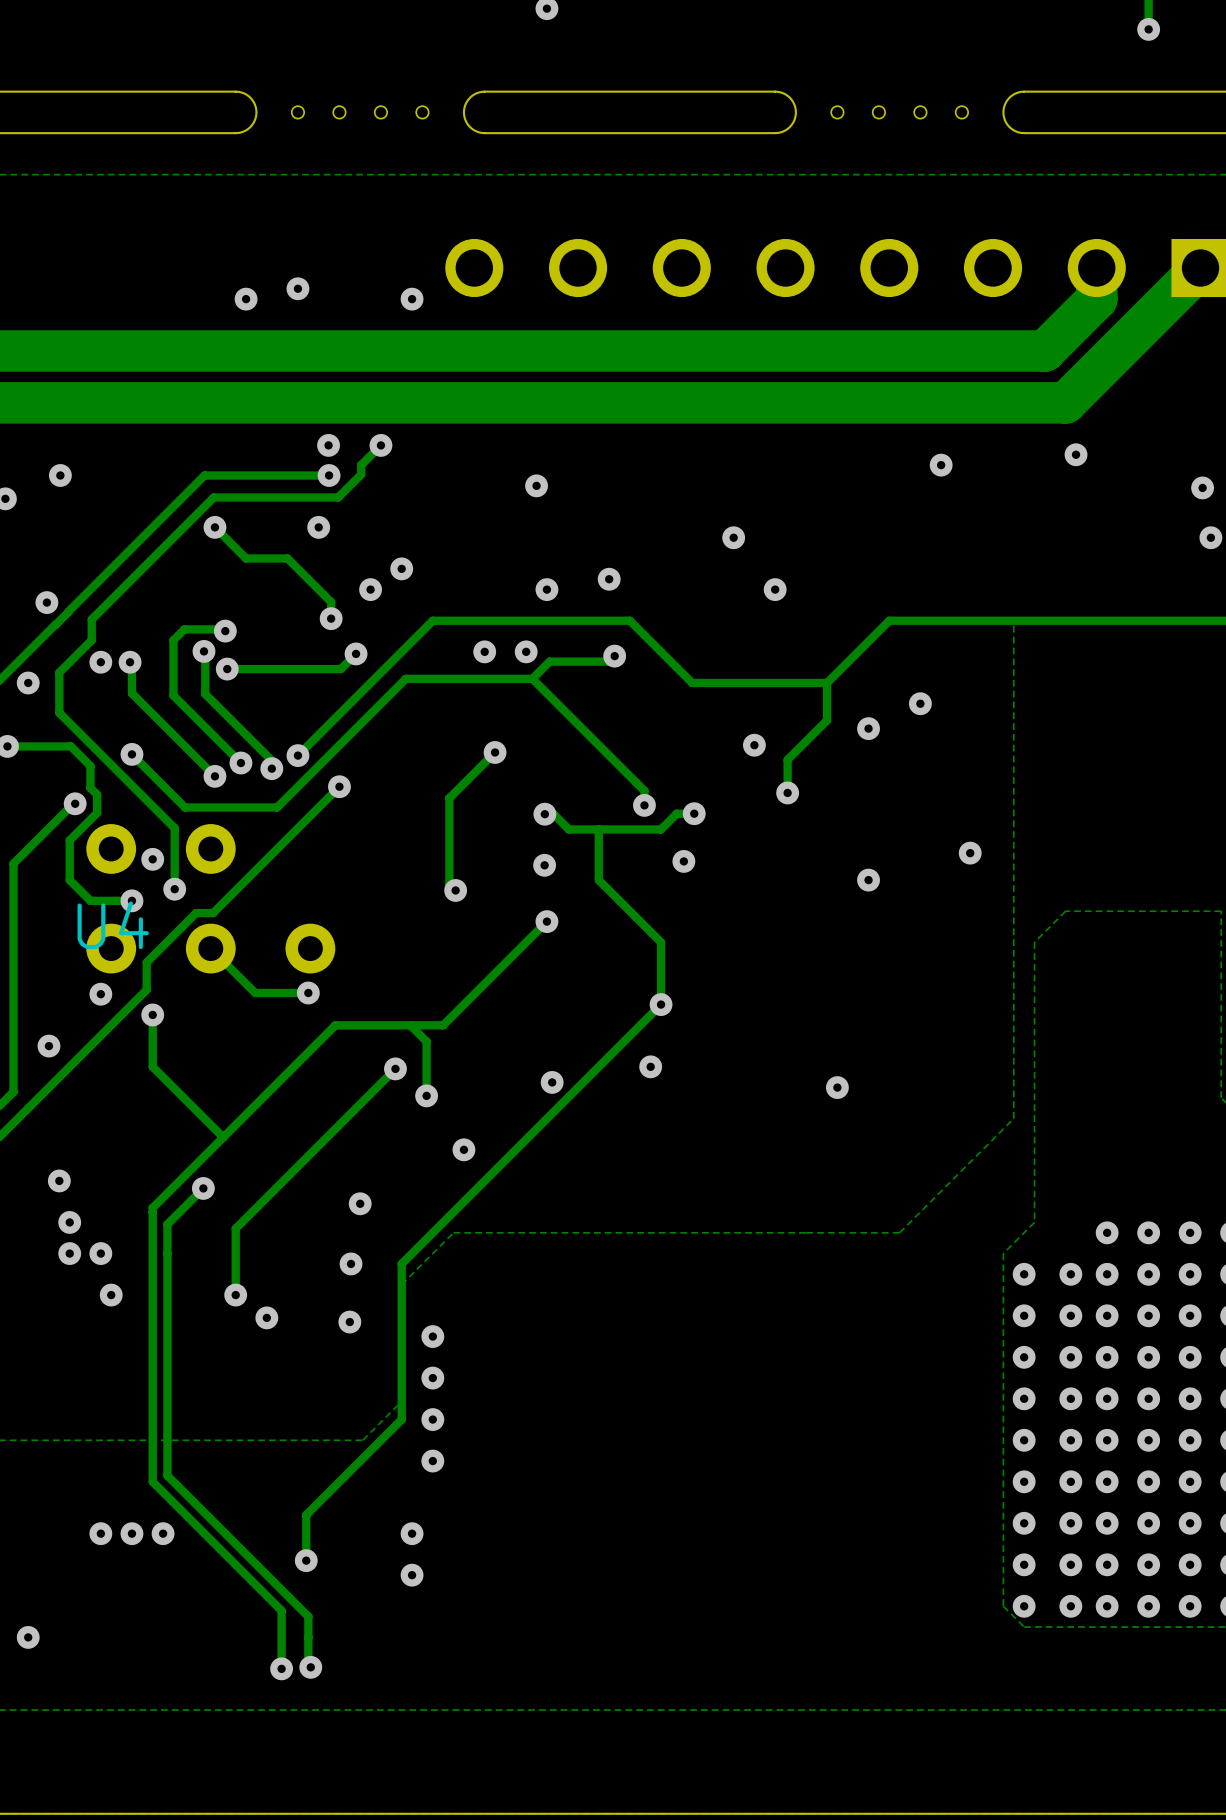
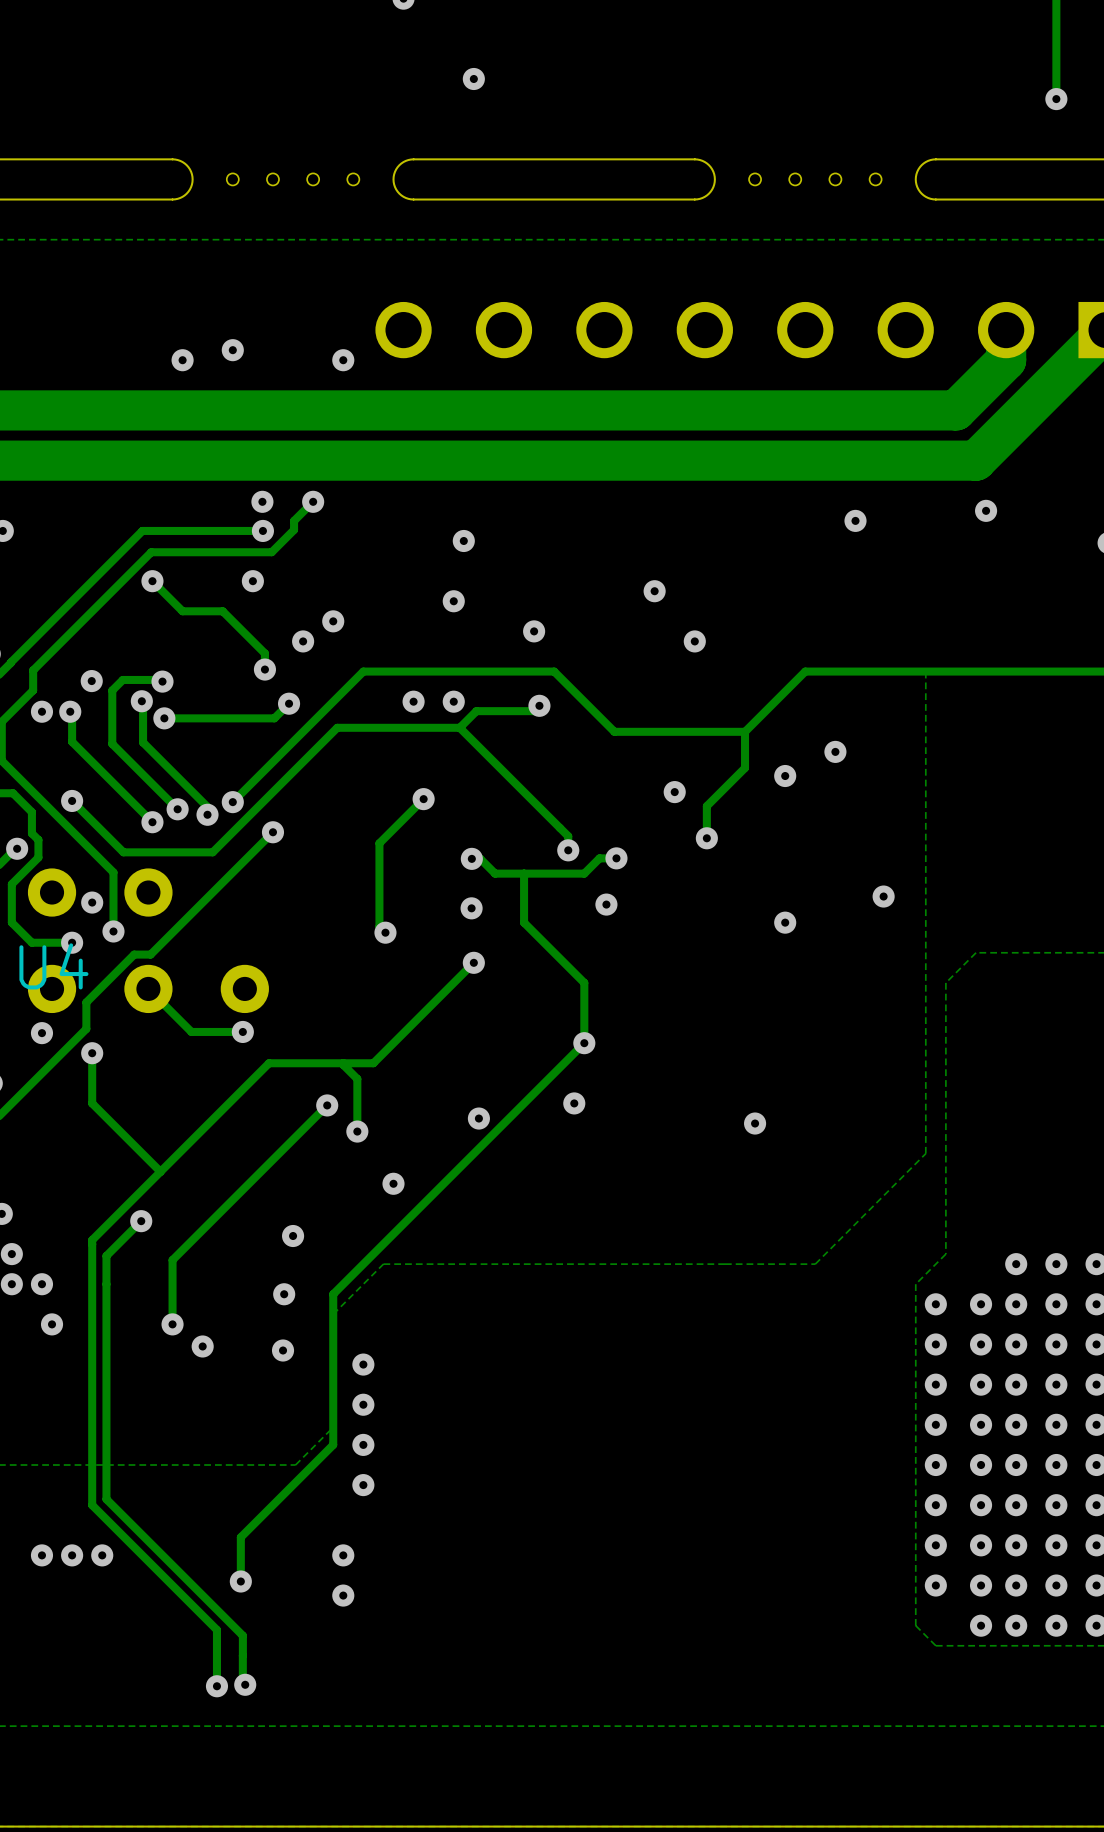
via position: (546, 589) -> (453, 601)
via: none -> (91, 681)
via: (1024, 1606) -> none

